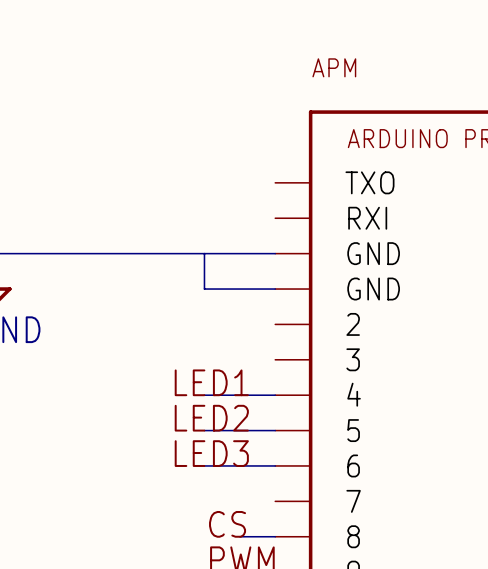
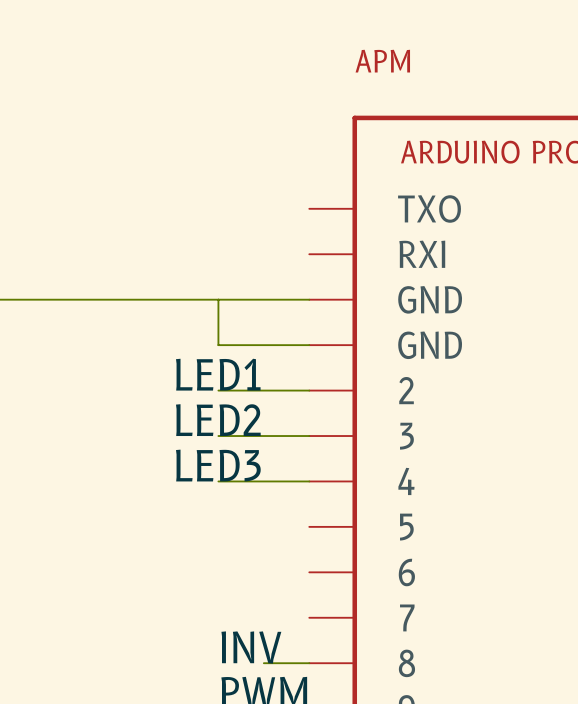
label: none -> LED1 (218, 374)
label: LED1 (211, 382) -> LED3 (218, 465)
label position: LED2 (211, 418) -> LED2 (218, 420)
wire: (204, 430) (275, 430) -> (218, 390) (309, 390)
label: LED3 (211, 453) -> none
wire: (204, 465) (275, 465) -> (218, 436) (309, 436)
label: CS (227, 524) -> INV (251, 647)

